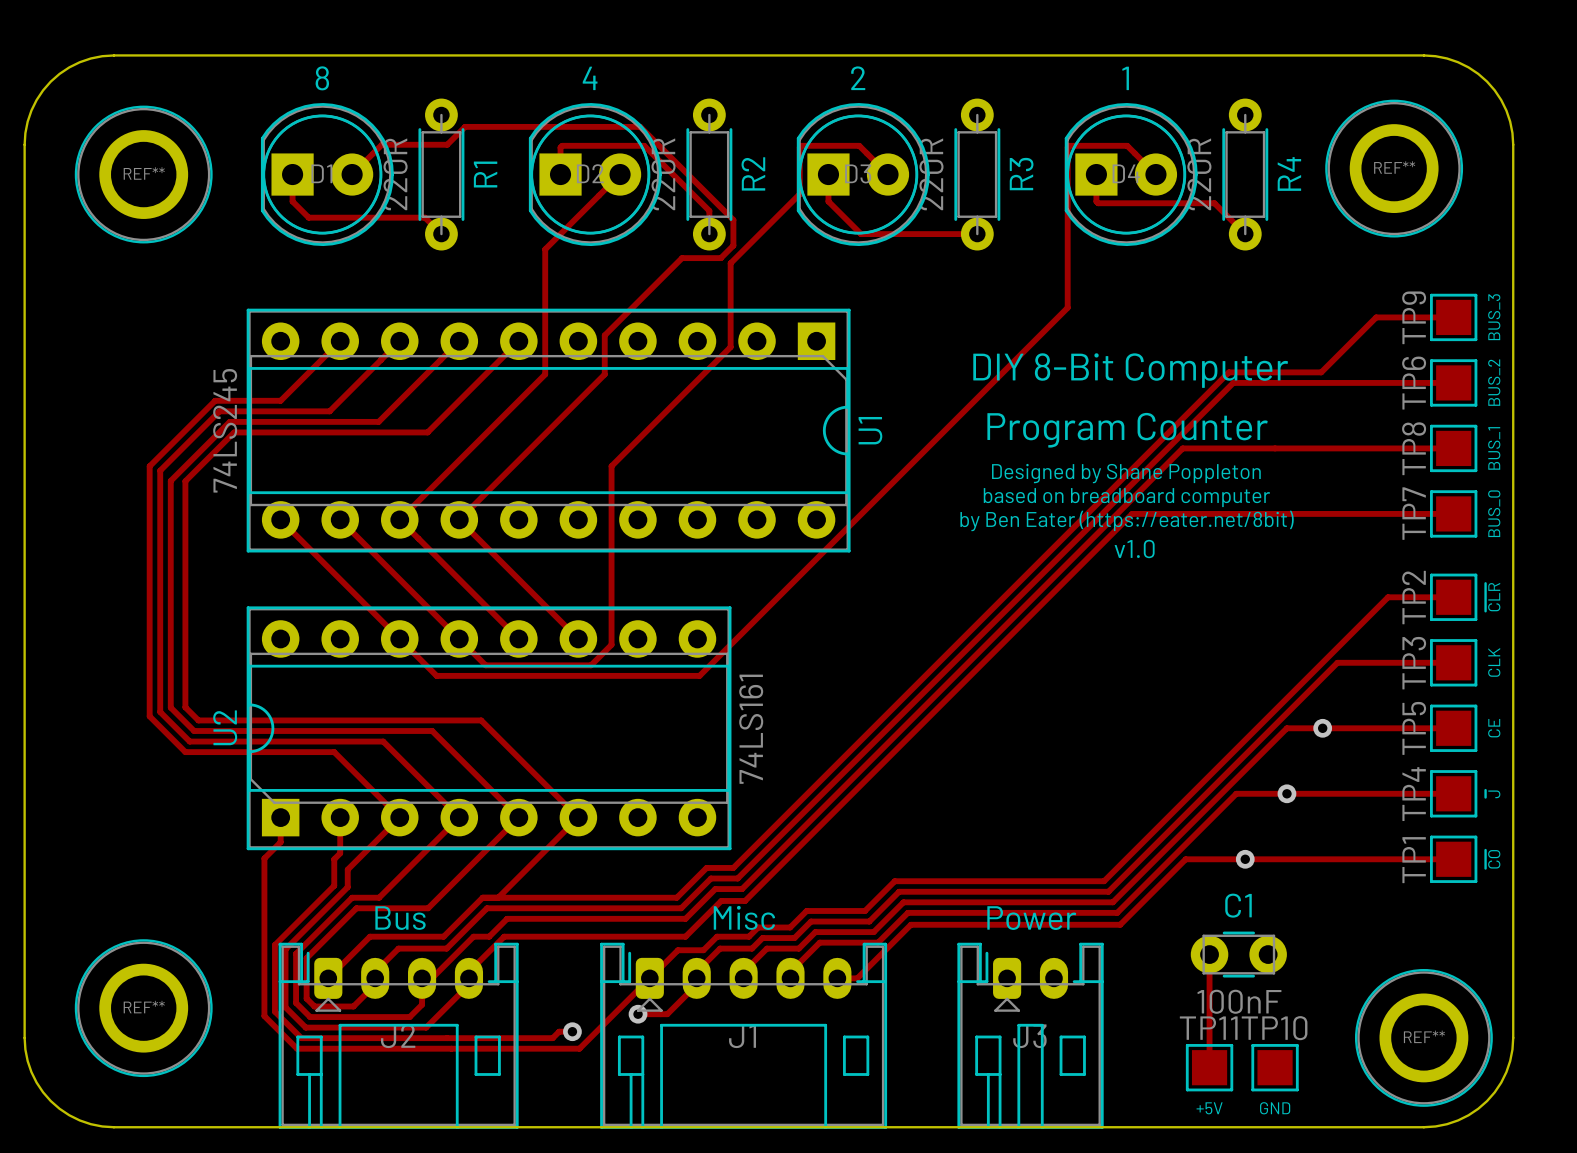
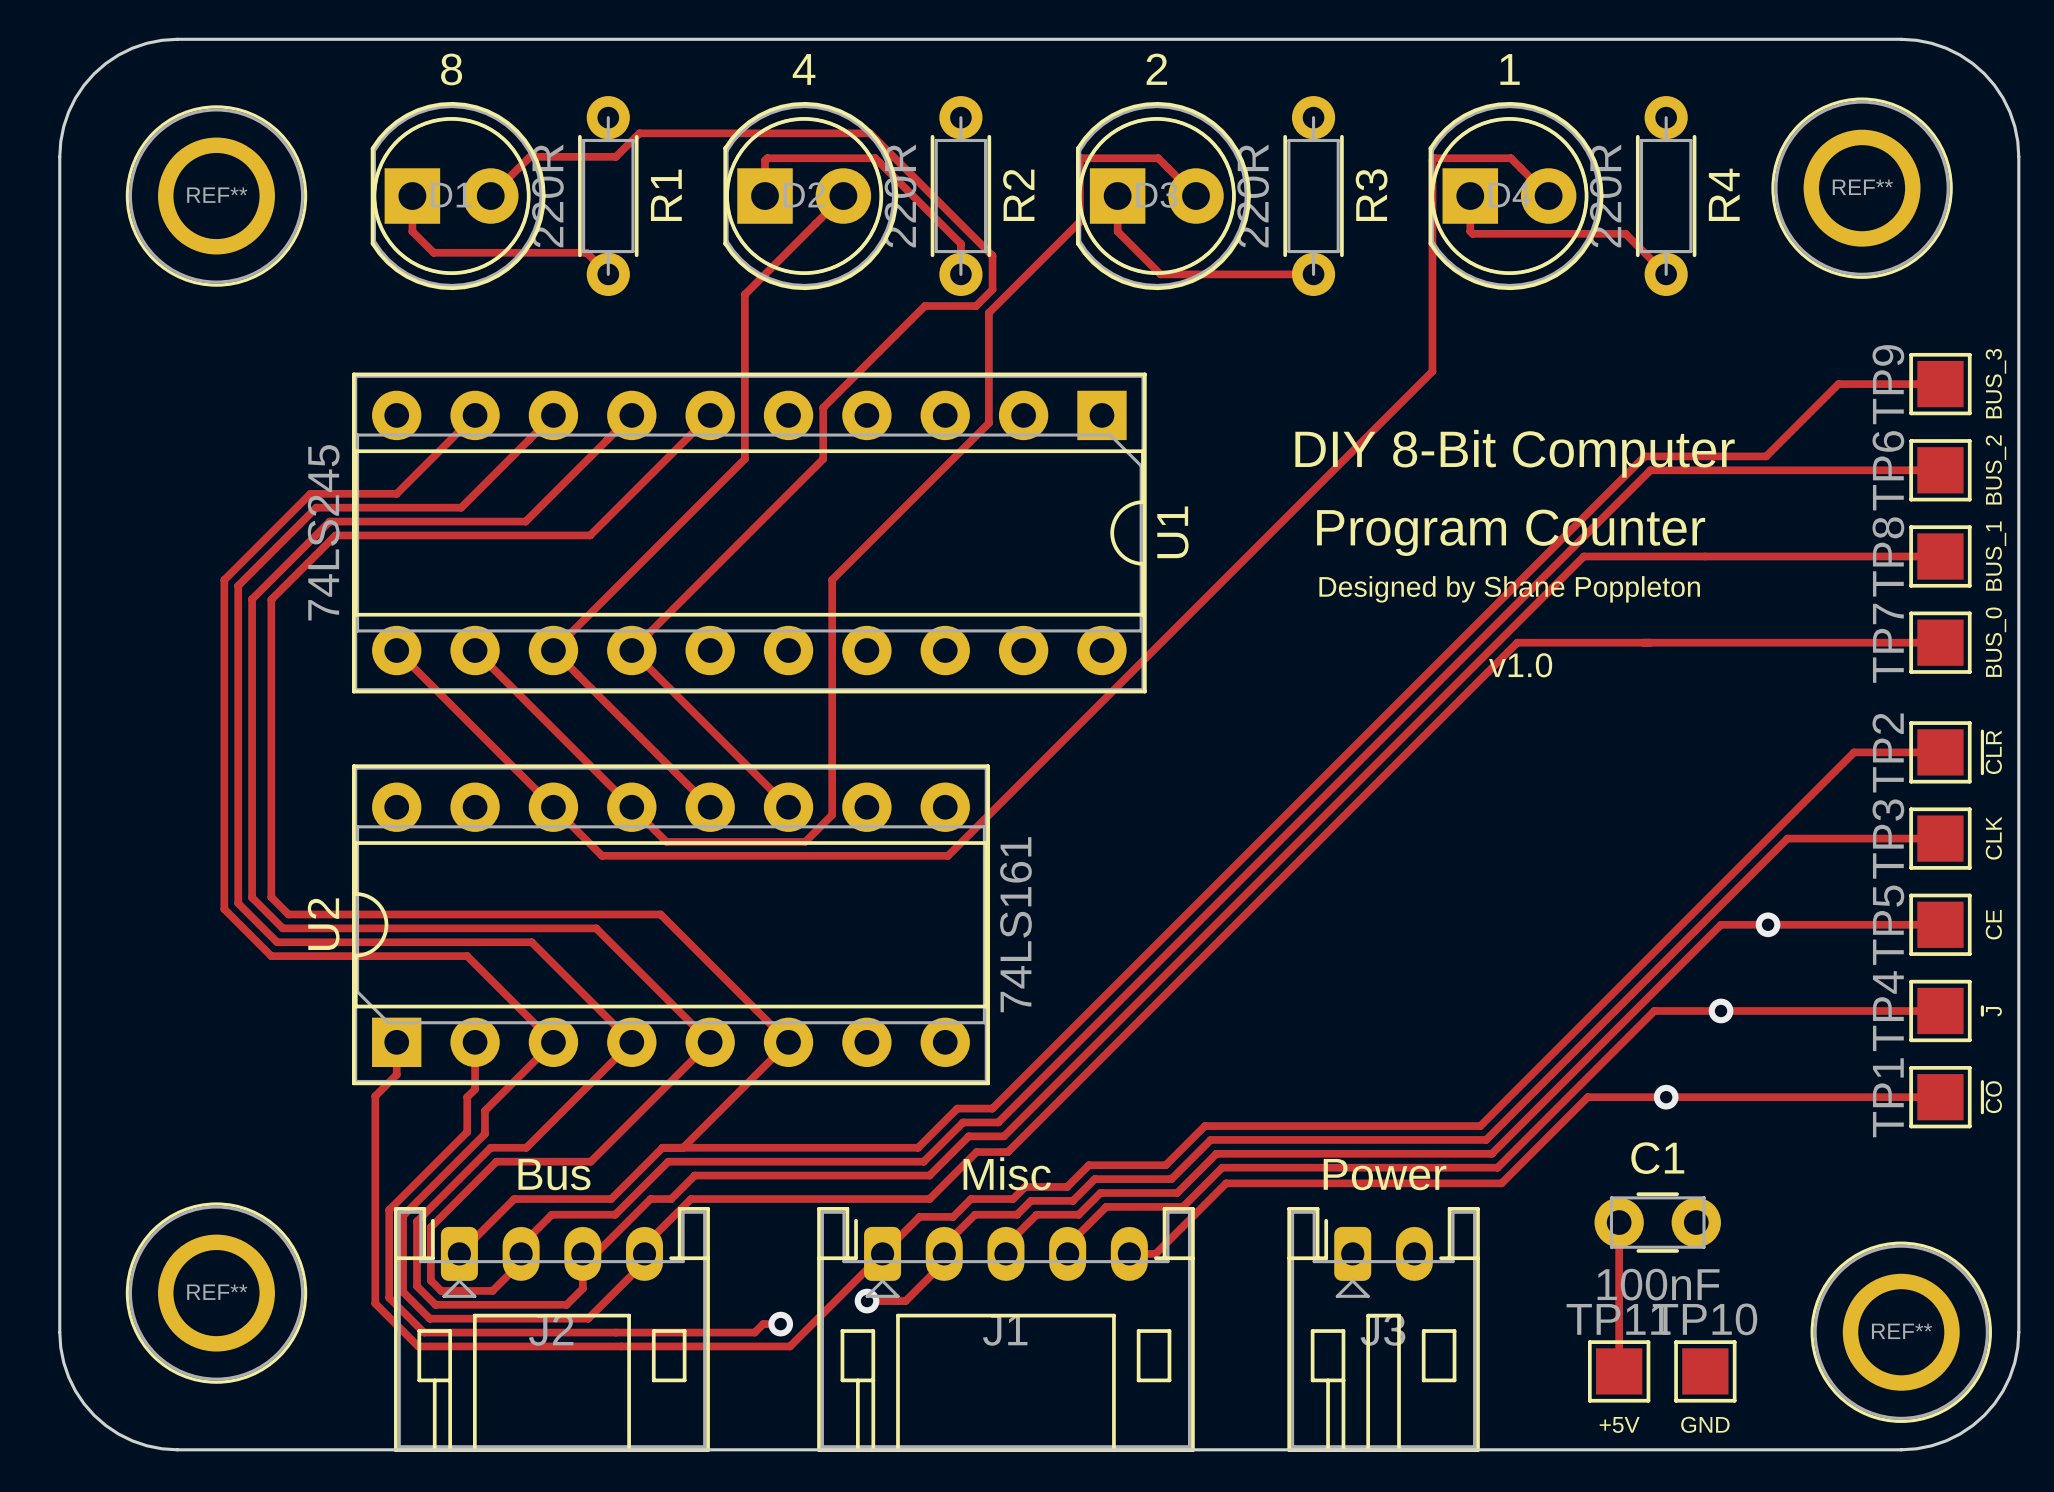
text: based on breadboard computer (1126, 497) -> none
text: by Ben Eater (https://eater.net/8bit) (1127, 520) -> none
text position: v1.0 (1134, 549) -> v1.0 (1520, 665)

